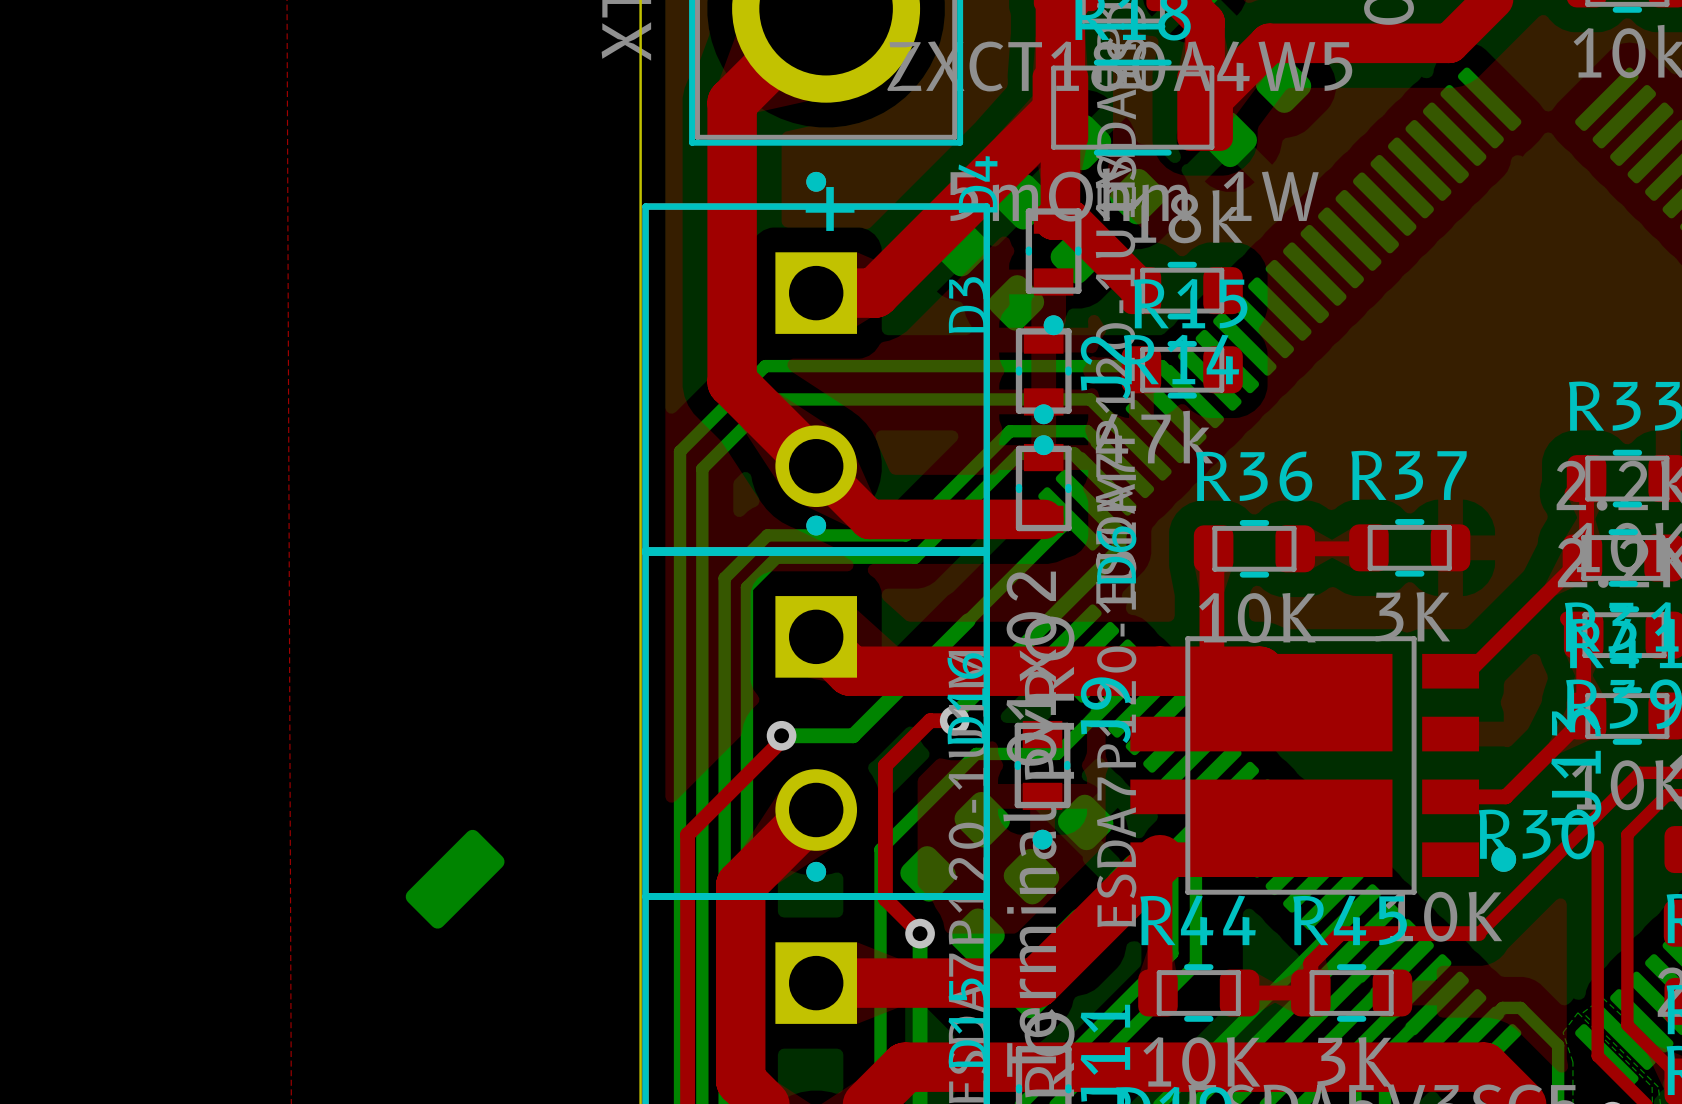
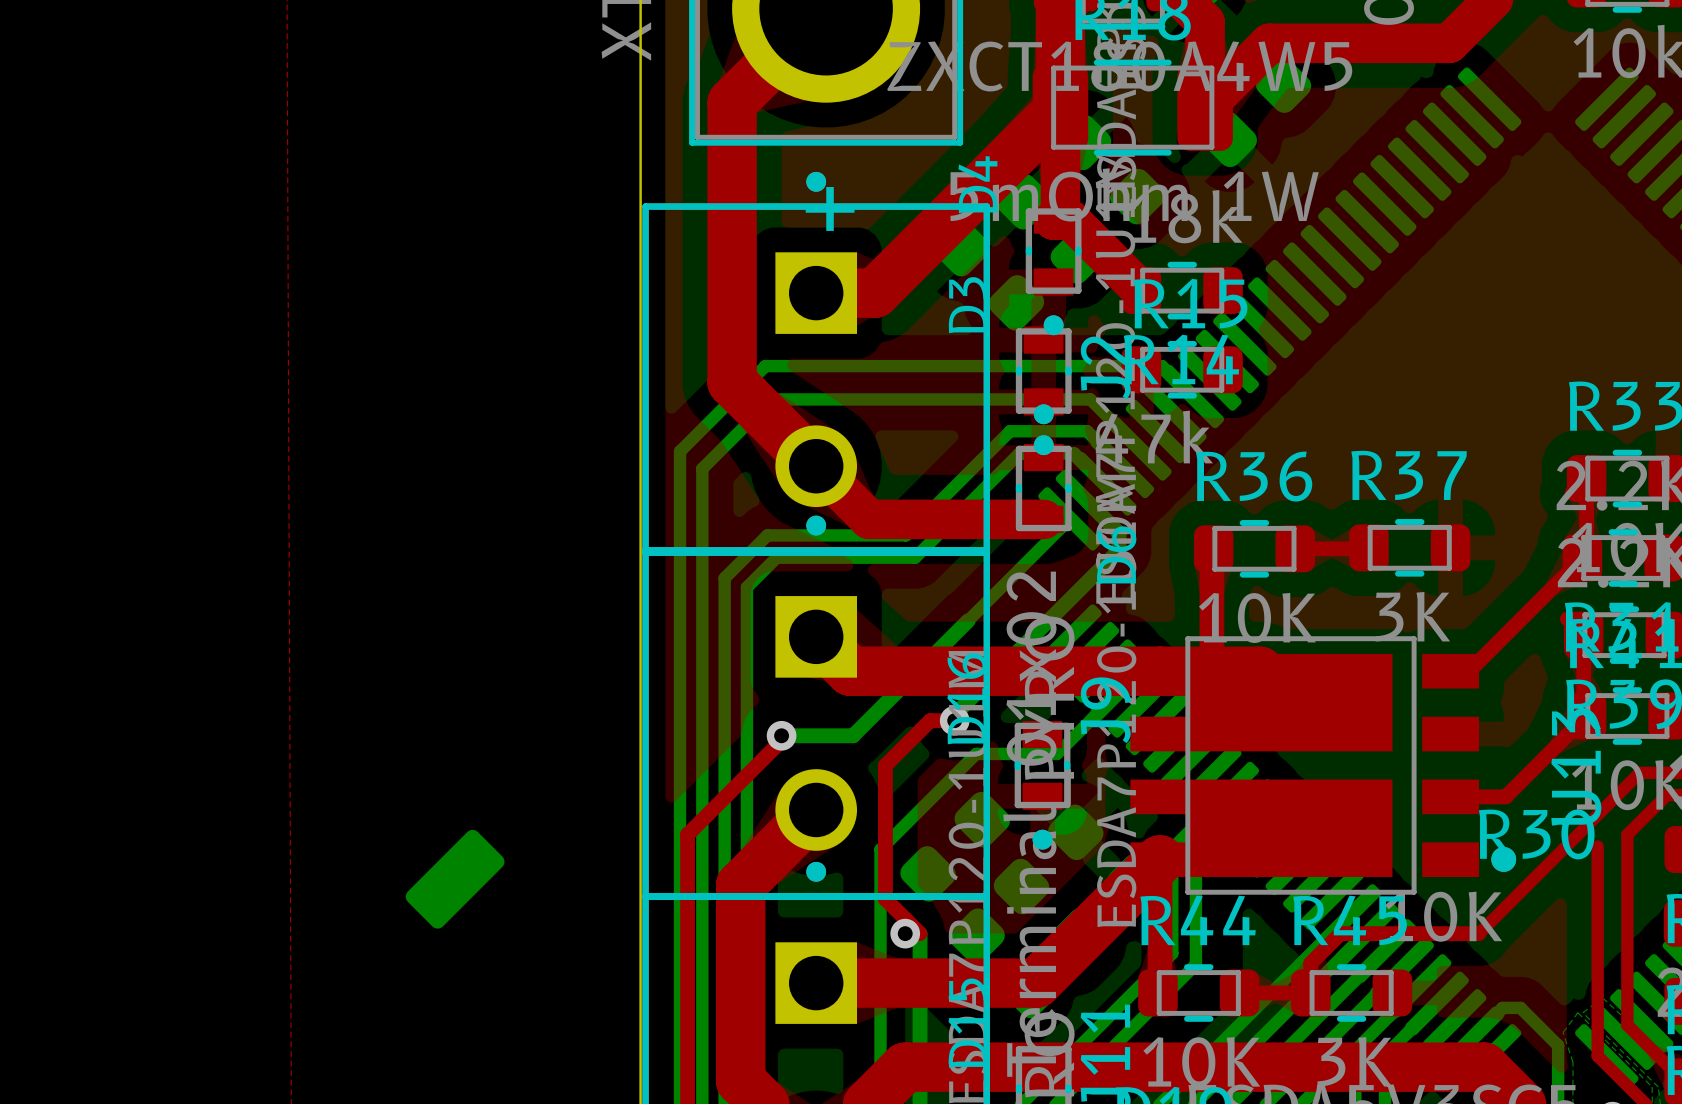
part position: (1058, 849) -> (1048, 859)
via position: (920, 933) -> (905, 933)

